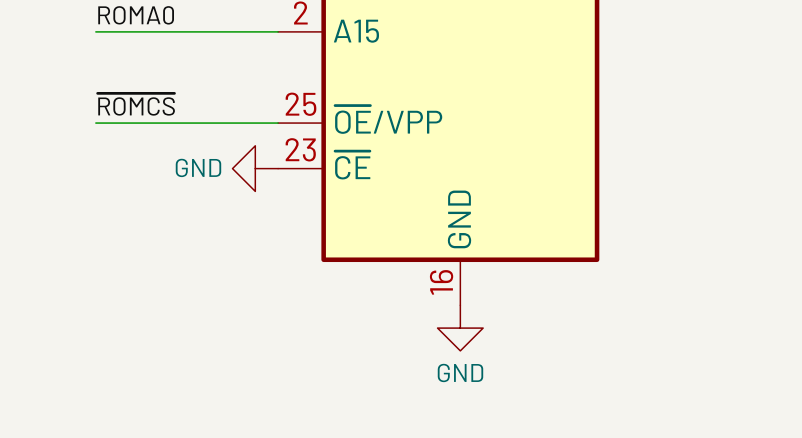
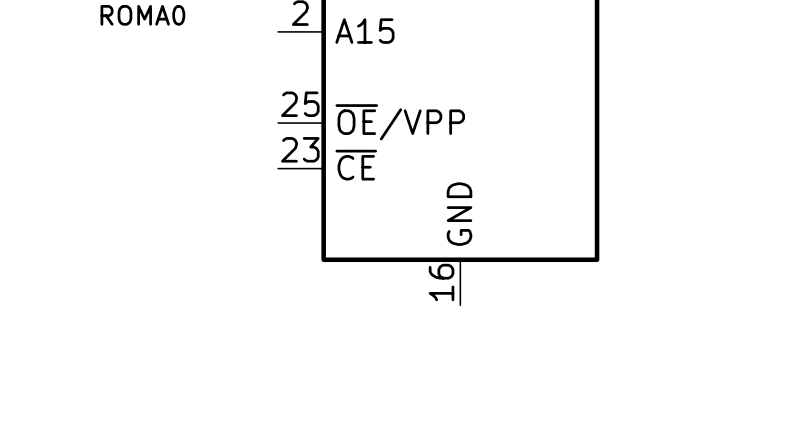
wire: (95, 31) (278, 31) -> none
label: ~{ROMCS} (136, 104) -> none
wire: (95, 123) (278, 123) -> none
power symbol: GND (255, 168) -> none
power symbol: GND (460, 328) -> none

